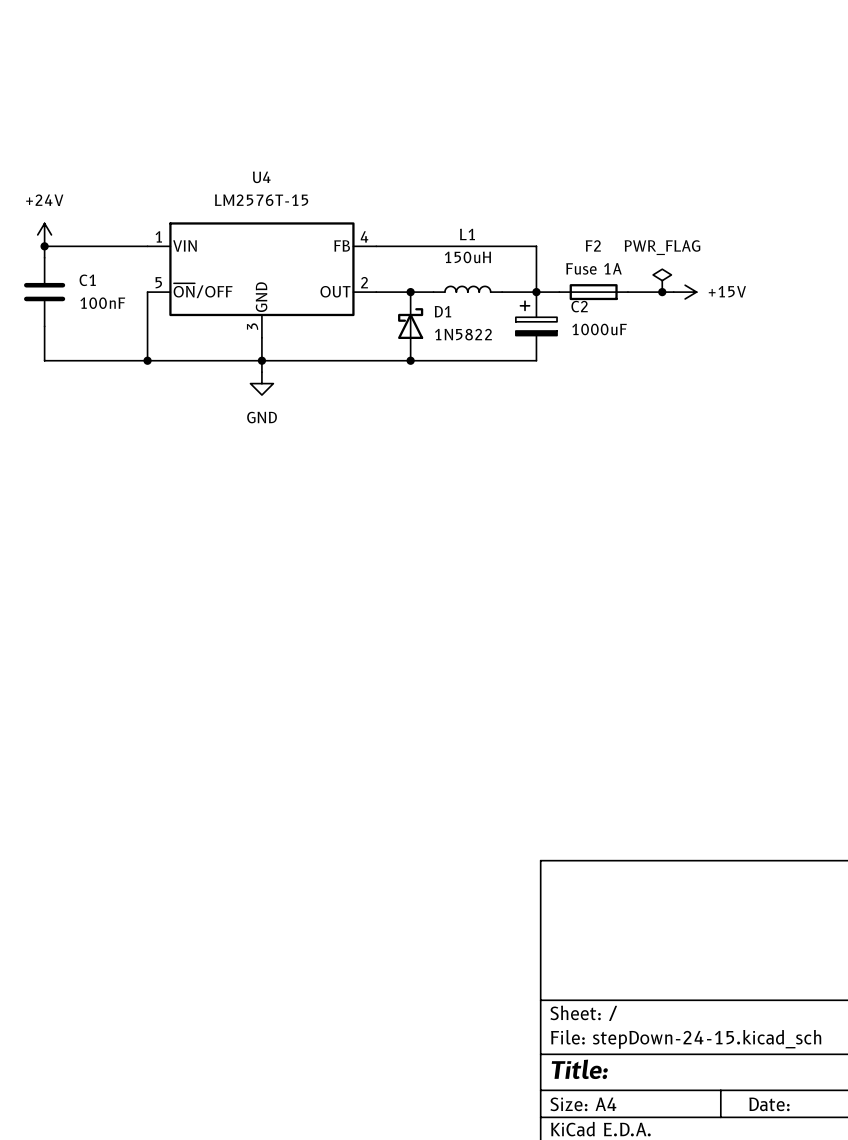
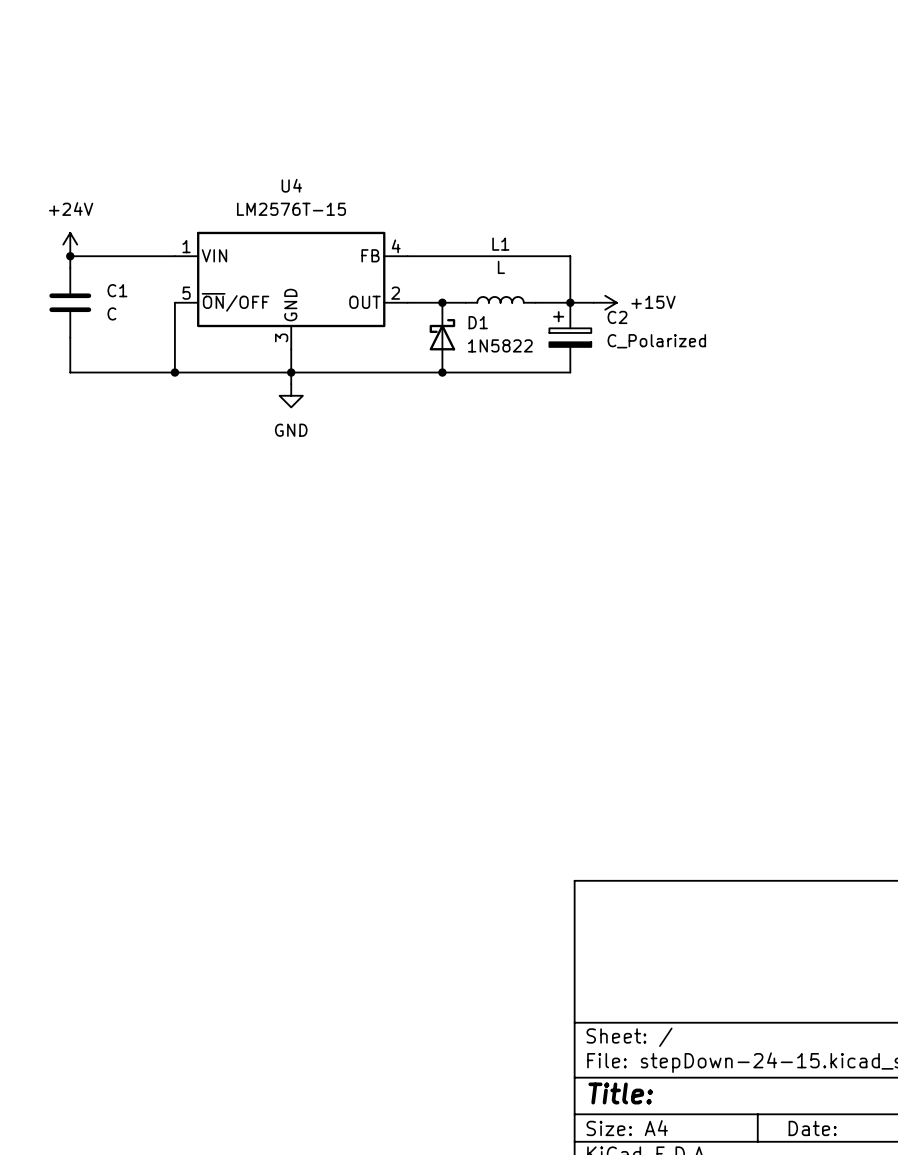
L1 value: 150uH (467, 257) -> L (501, 267)
power symbol: PWR_FLAG (662, 280) -> none
F2: Fuse 1A (593, 292) -> none
wire: (627, 292) (673, 292) -> none
junction: (662, 292) -> none
power symbol position: +15V (685, 292) -> +15V (605, 302)
C1 value: 100nF (102, 303) -> C (111, 313)
C2 value: 1000uF (599, 329) -> C_Polarized (656, 341)

